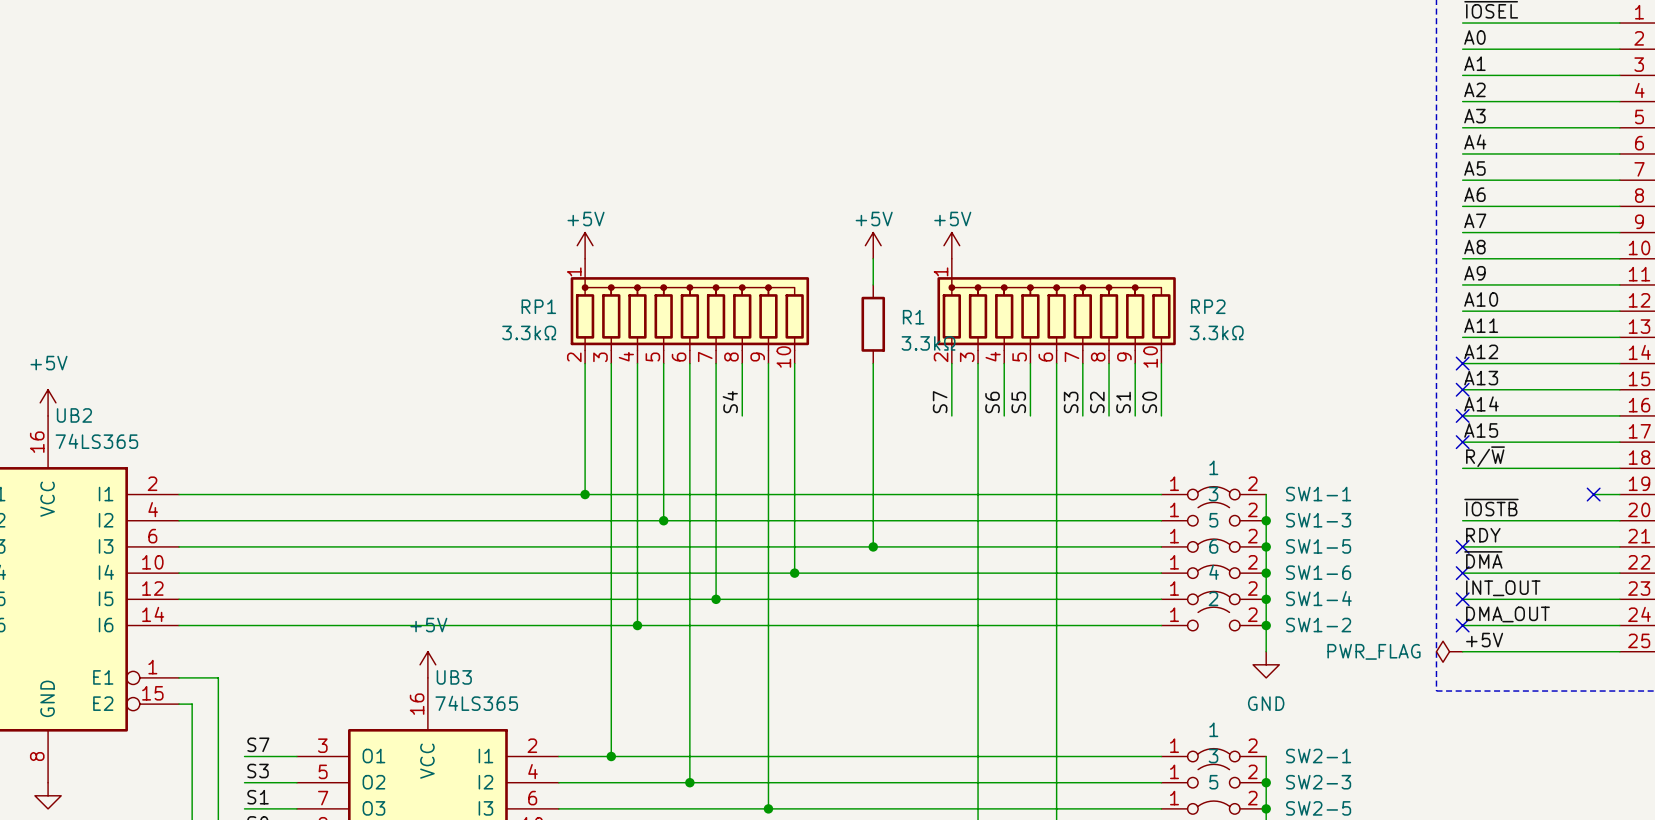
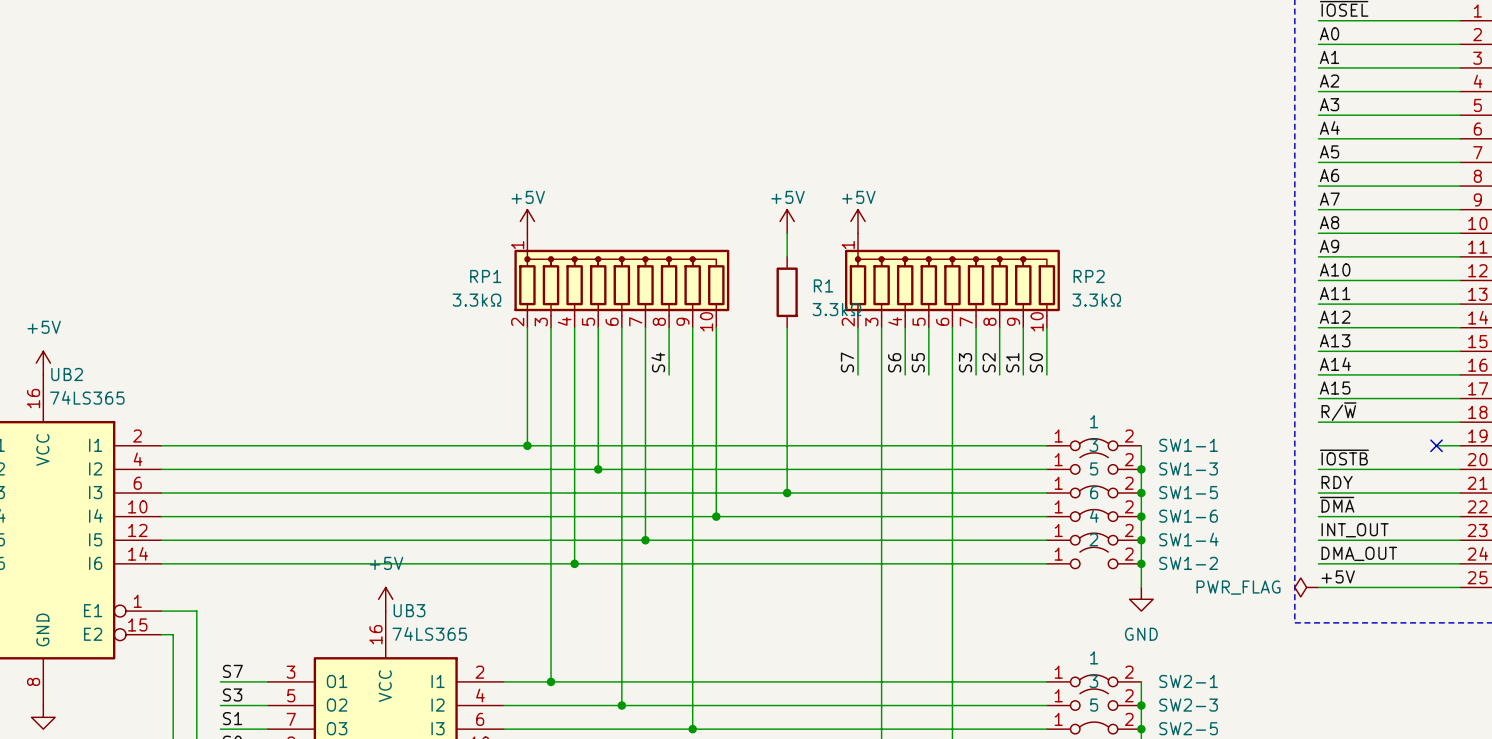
no-connect mark: (1462, 363) -> none
no-connect mark: (1462, 389) -> none
no-connect mark: (1462, 415) -> none
no-connect mark: (1462, 442) -> none
no-connect mark: (1462, 546) -> none
no-connect mark: (1462, 573) -> none
no-connect mark: (1462, 599) -> none
no-connect mark: (1462, 625) -> none

